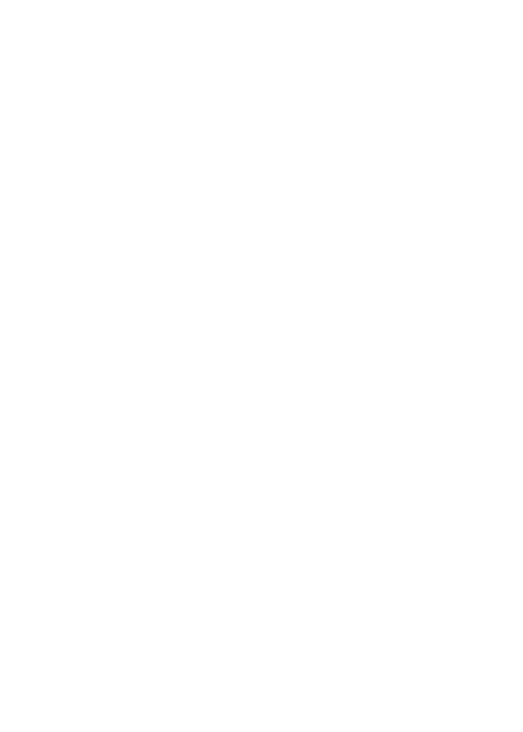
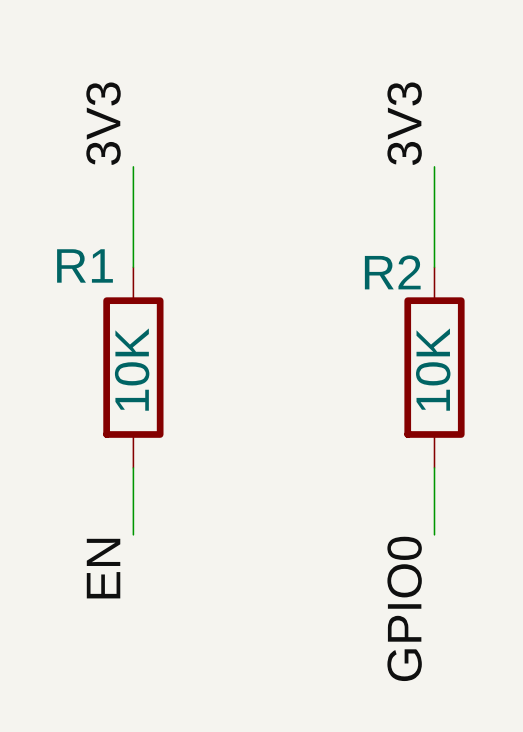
label: none -> 3V3 (103, 123)
label: none -> 3V3 (404, 123)
wire: none -> (133, 166) (133, 267)
wire: none -> (434, 166) (434, 267)
R1: none -> 10K (133, 367)
R2: none -> 10K (434, 367)
wire: none -> (133, 467) (133, 534)
wire: none -> (434, 467) (434, 534)
label: none -> EN (103, 568)
label: none -> GPIO0 (404, 608)

